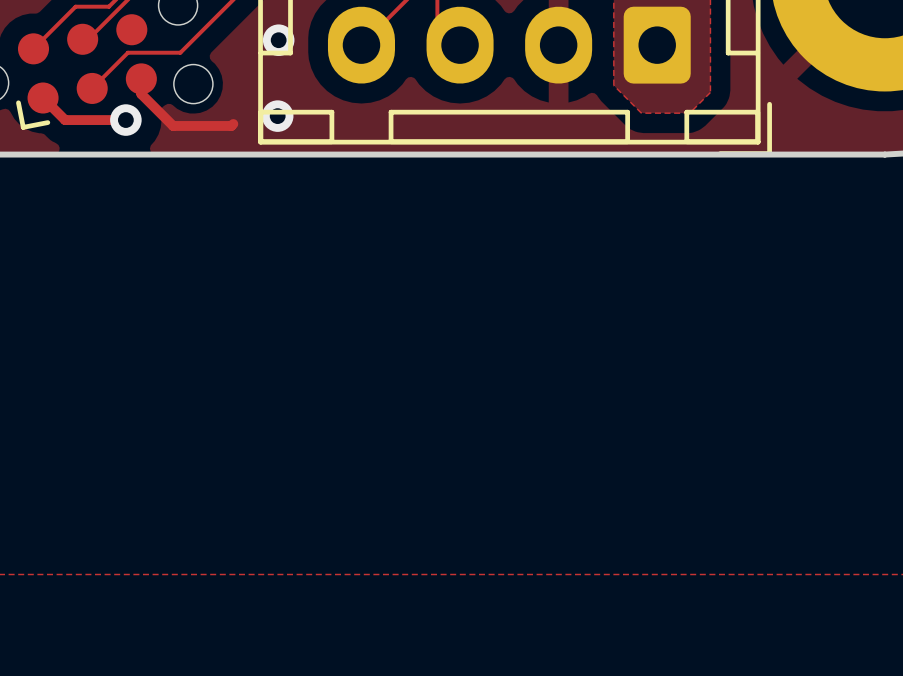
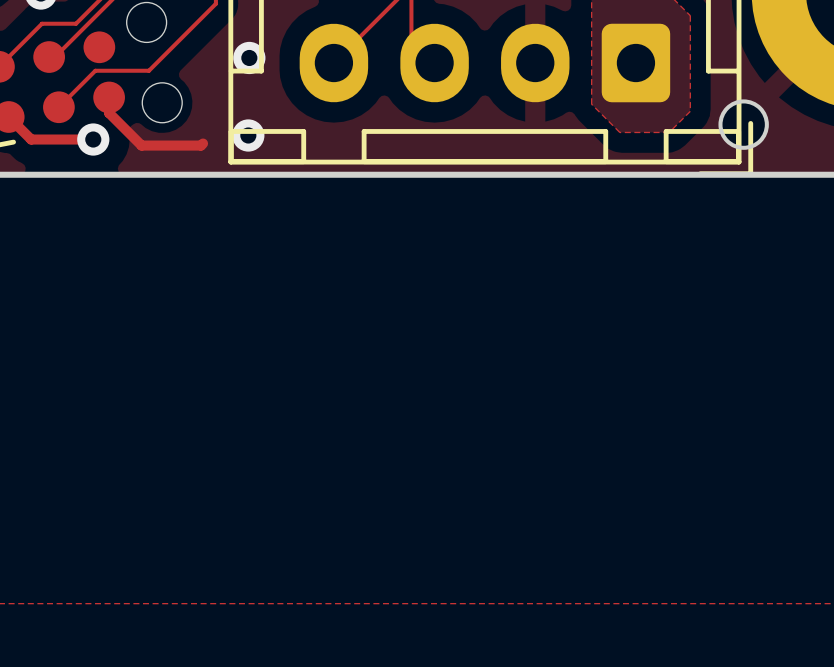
round board edge: none -> [718, 99, 769, 150]

